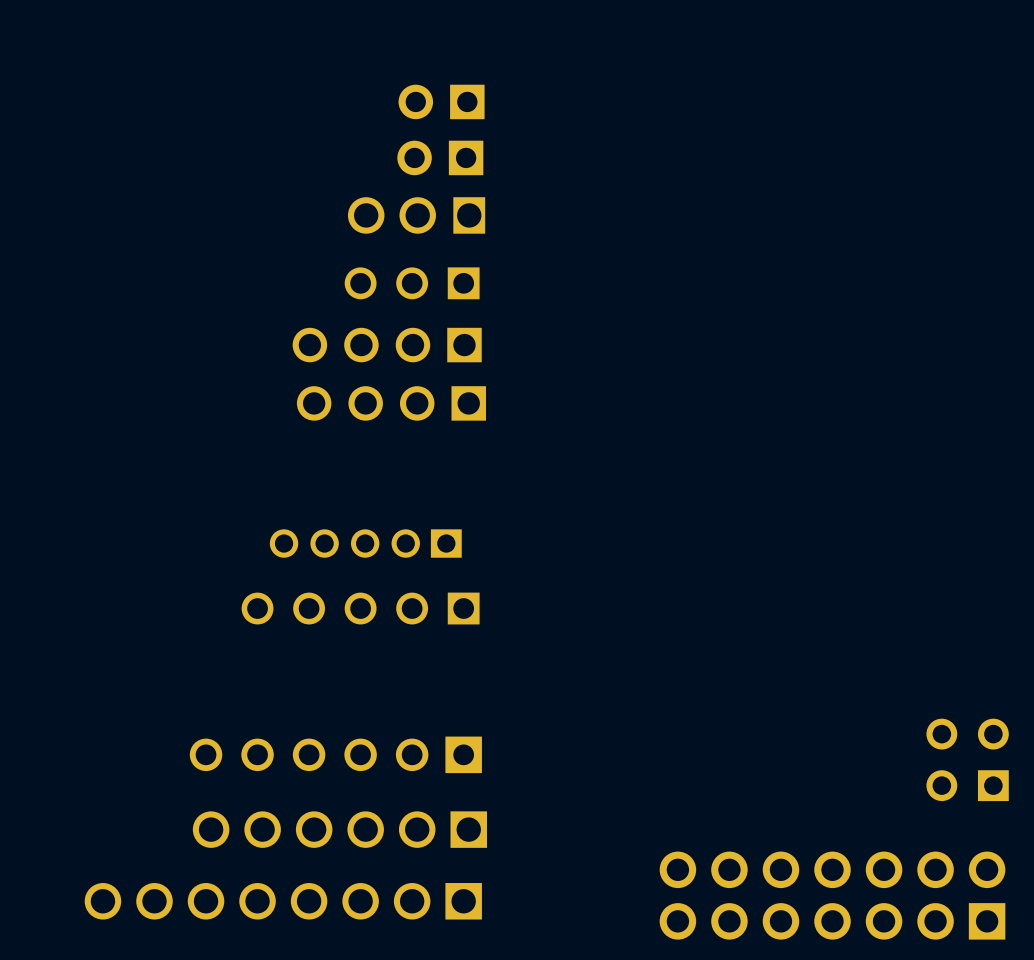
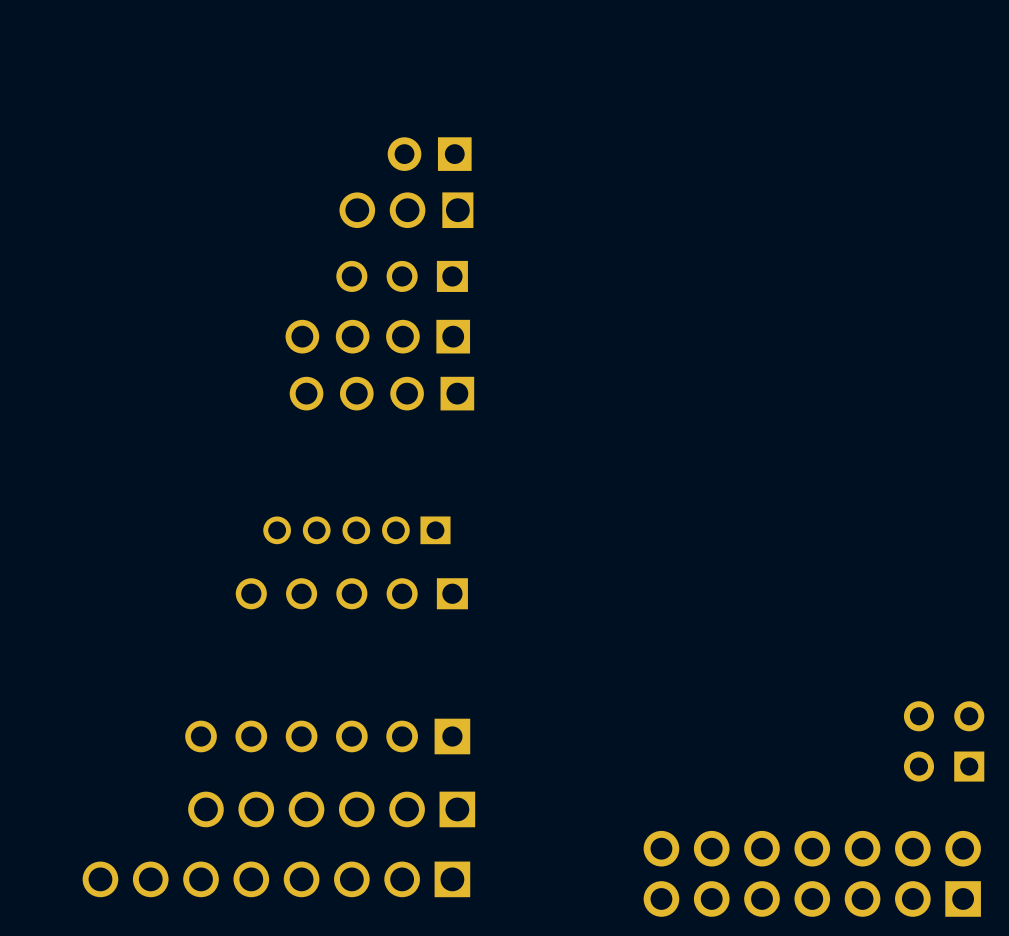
part: (441, 101) -> none

